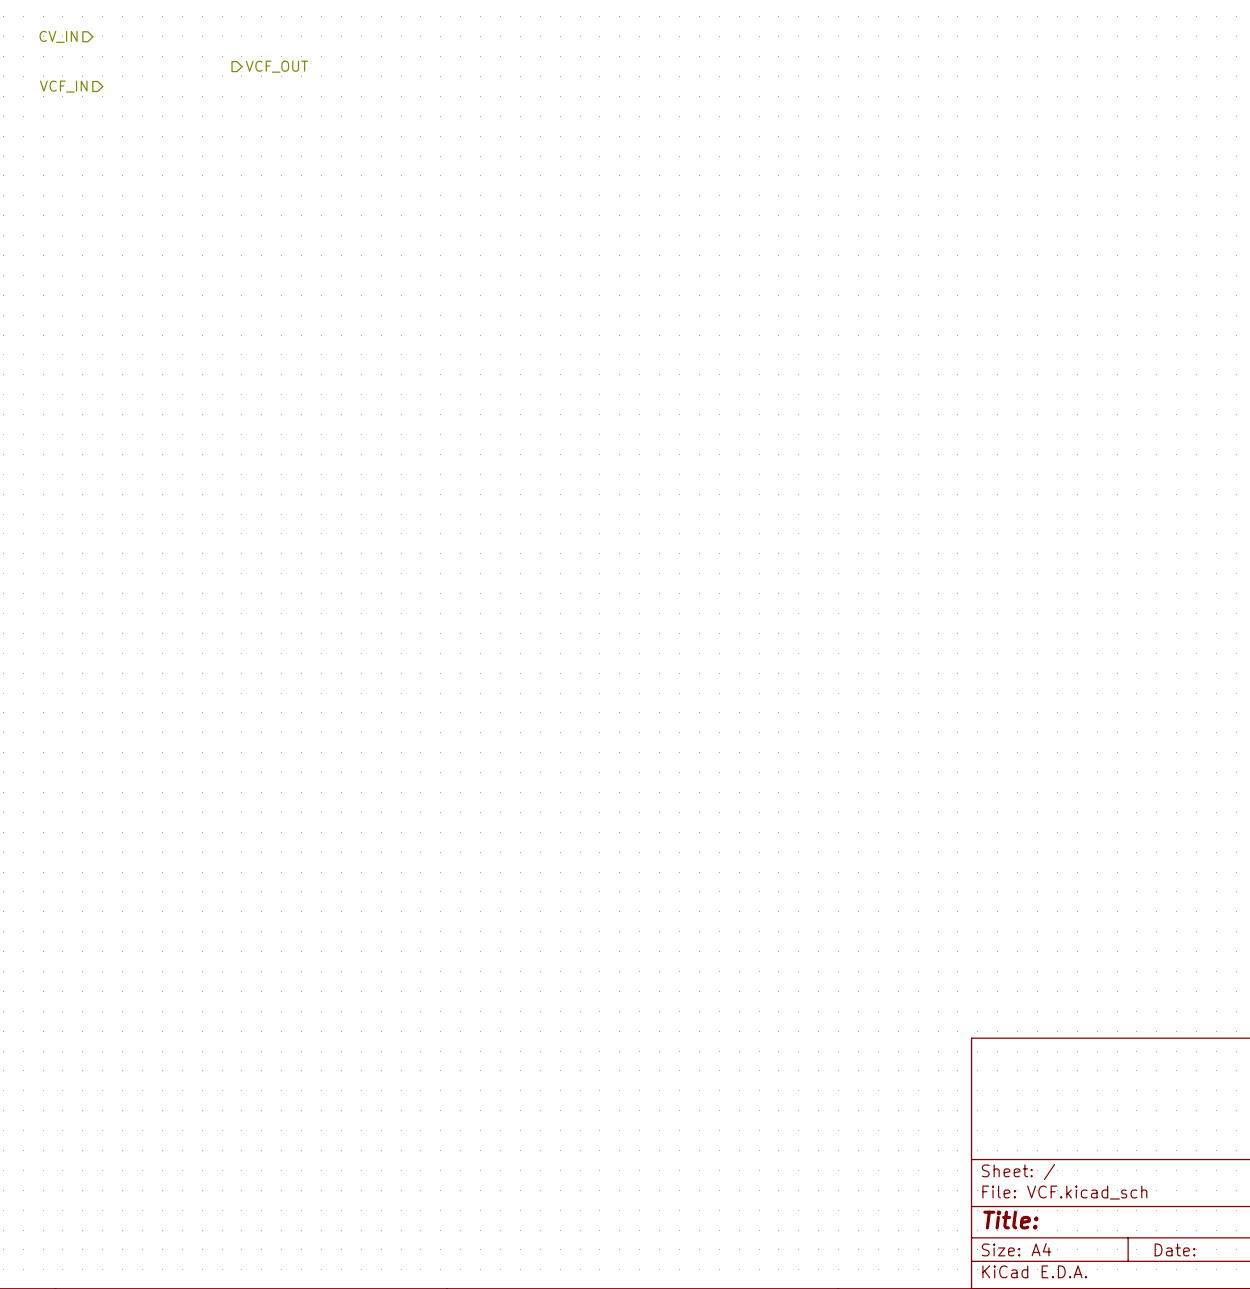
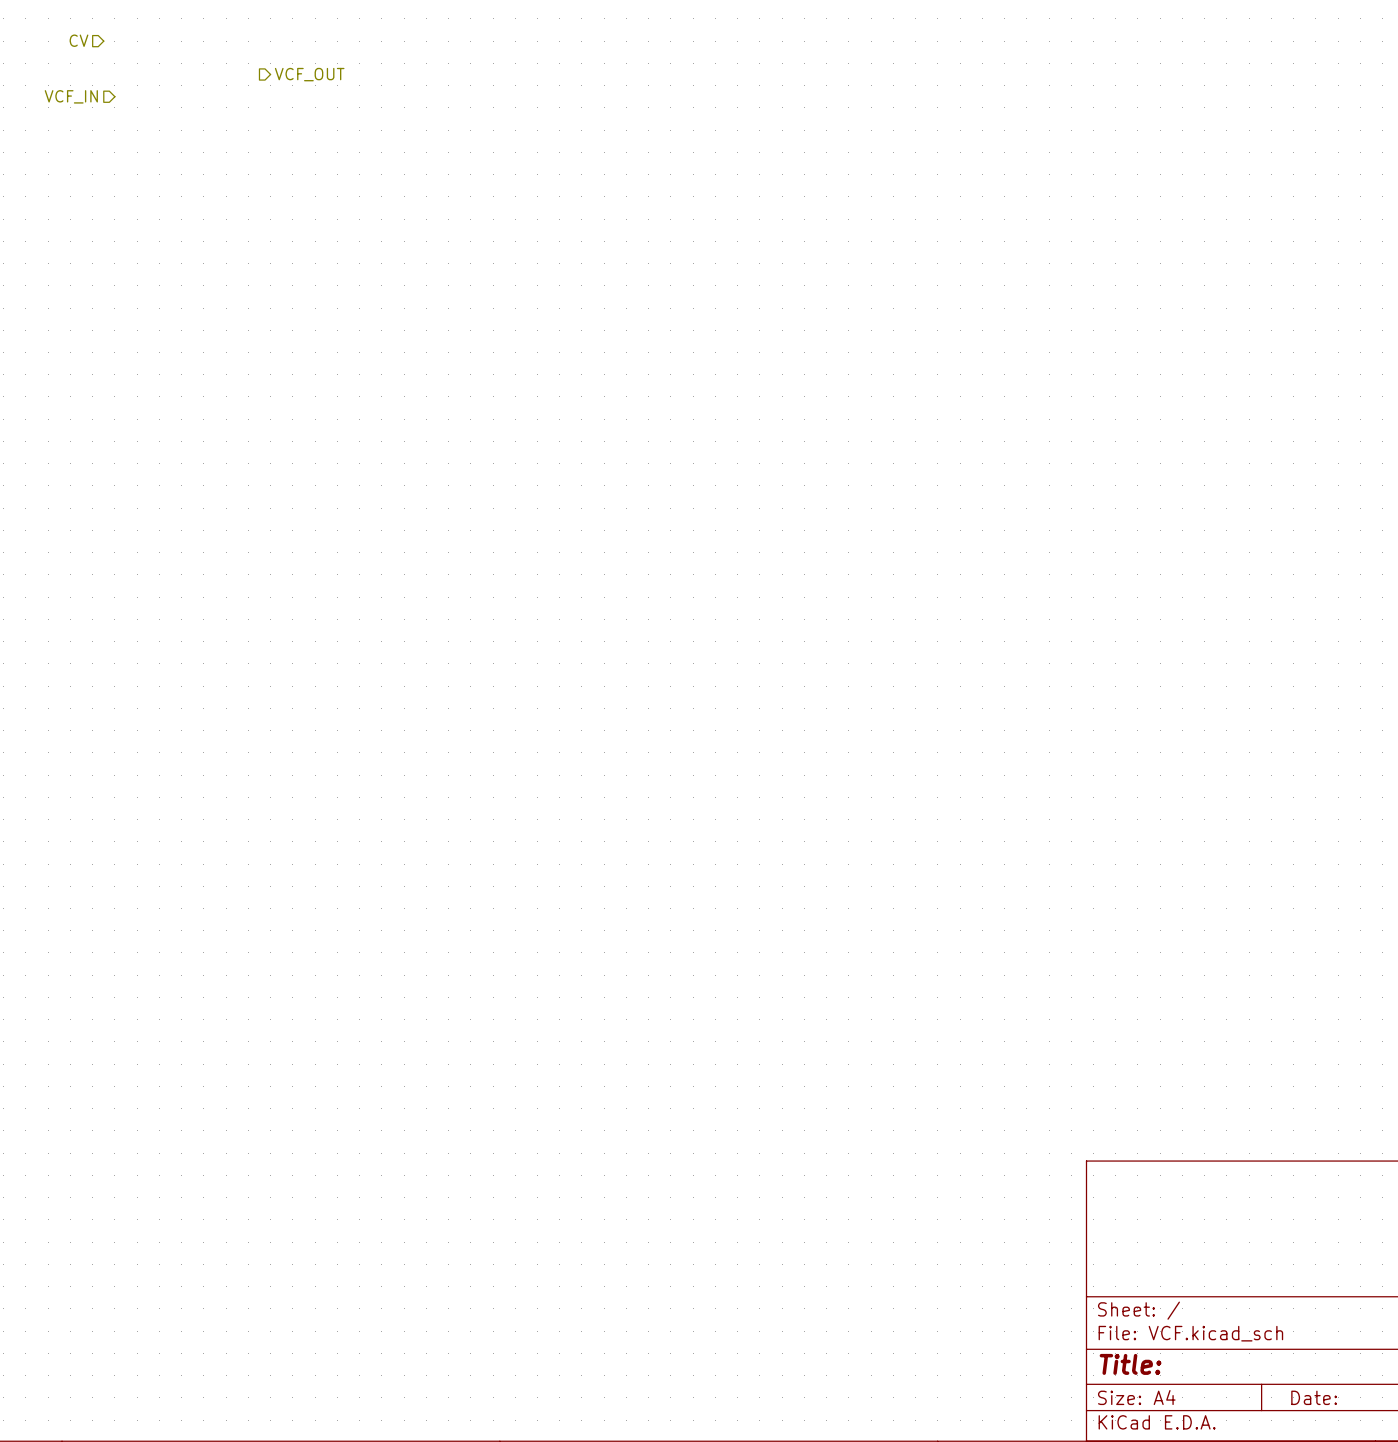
hierarchical label: CV_IN (58, 36) -> CV (78, 40)

